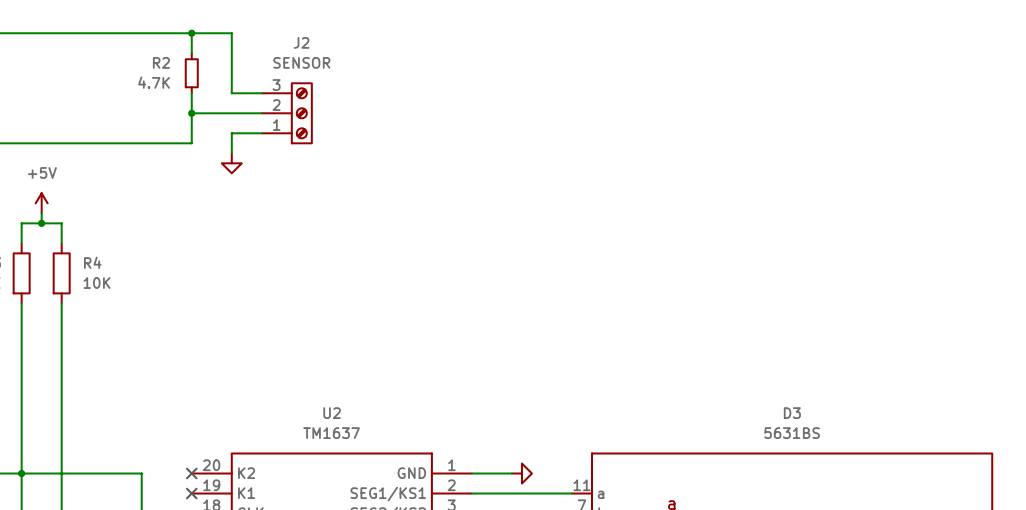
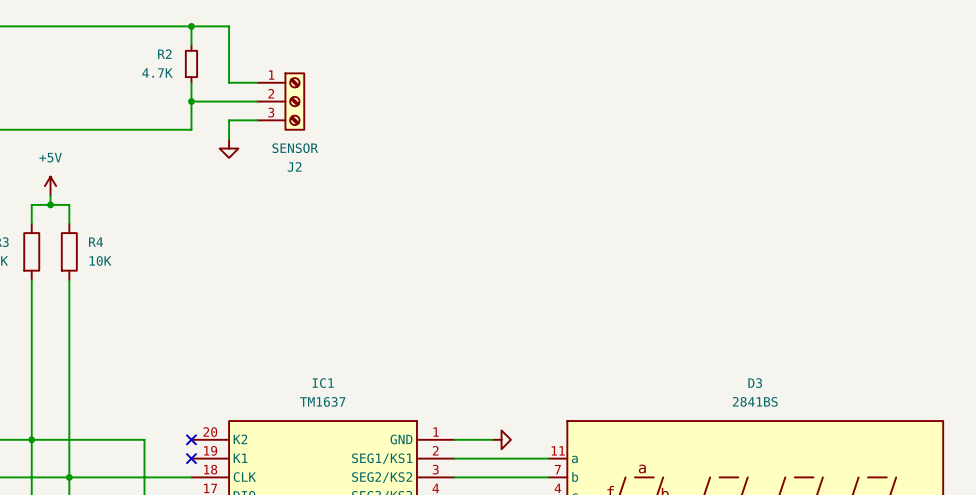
J2 flip: as is (301, 113) -> up-down (294, 101)
U2 name: U2 (332, 413) -> IC1 (323, 383)
D3 value: 5631BS (792, 433) -> 2841BS (755, 401)

